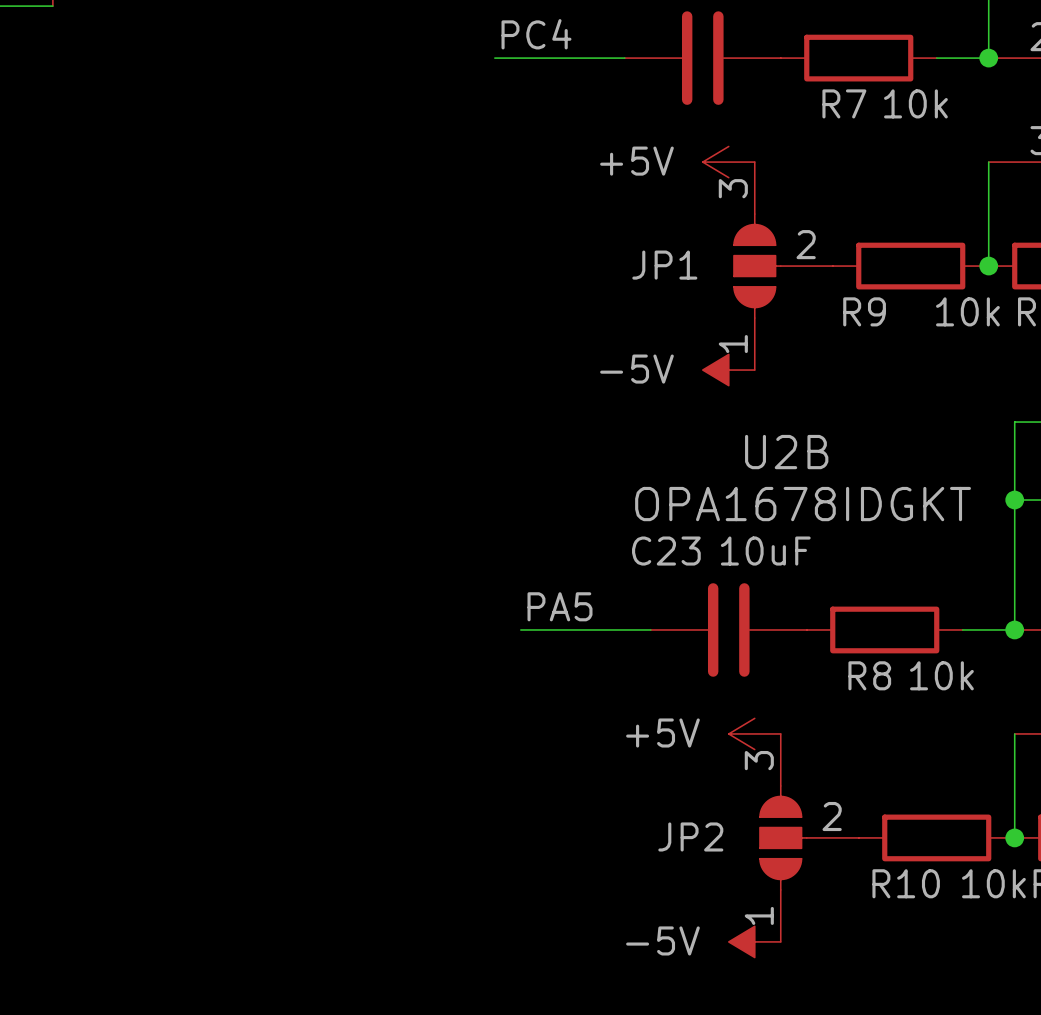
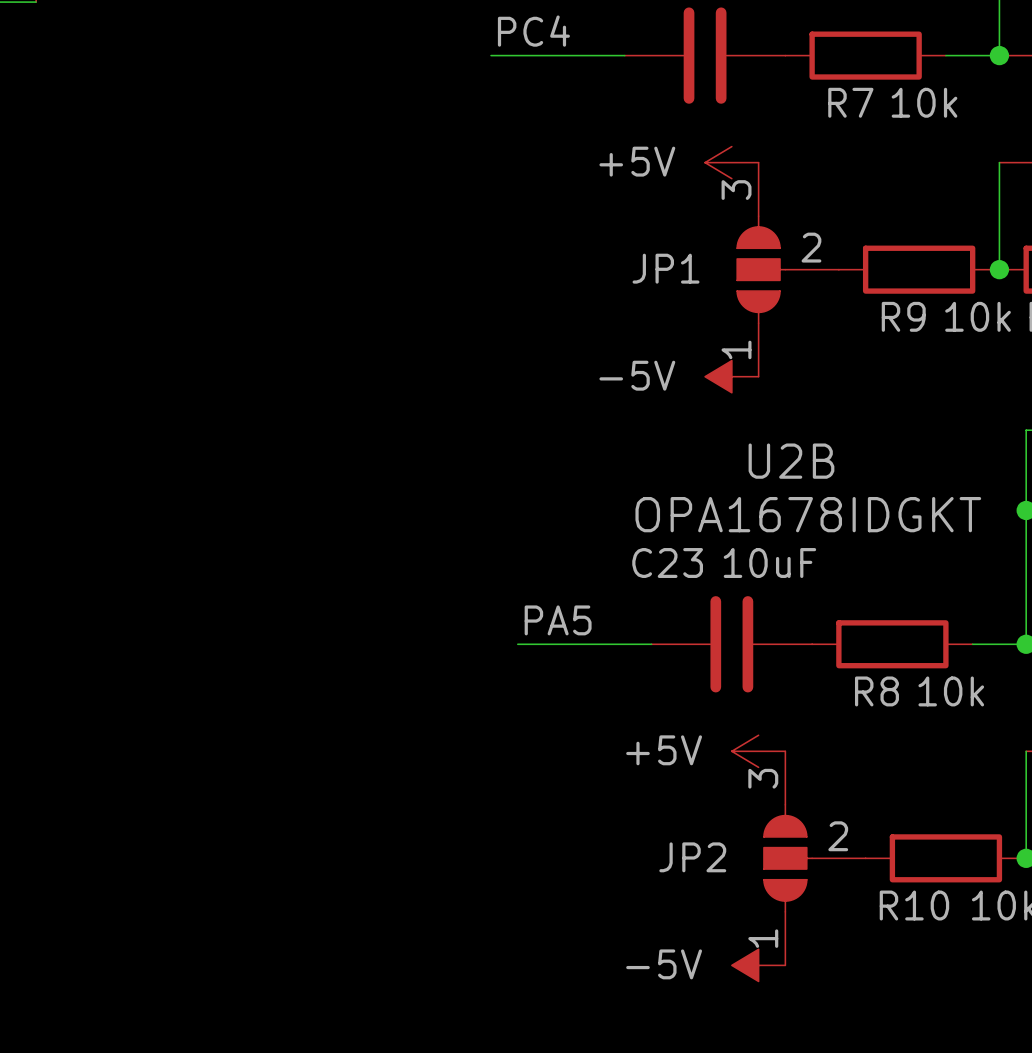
R9 name position: R9 (864, 311) -> R9 (903, 316)

